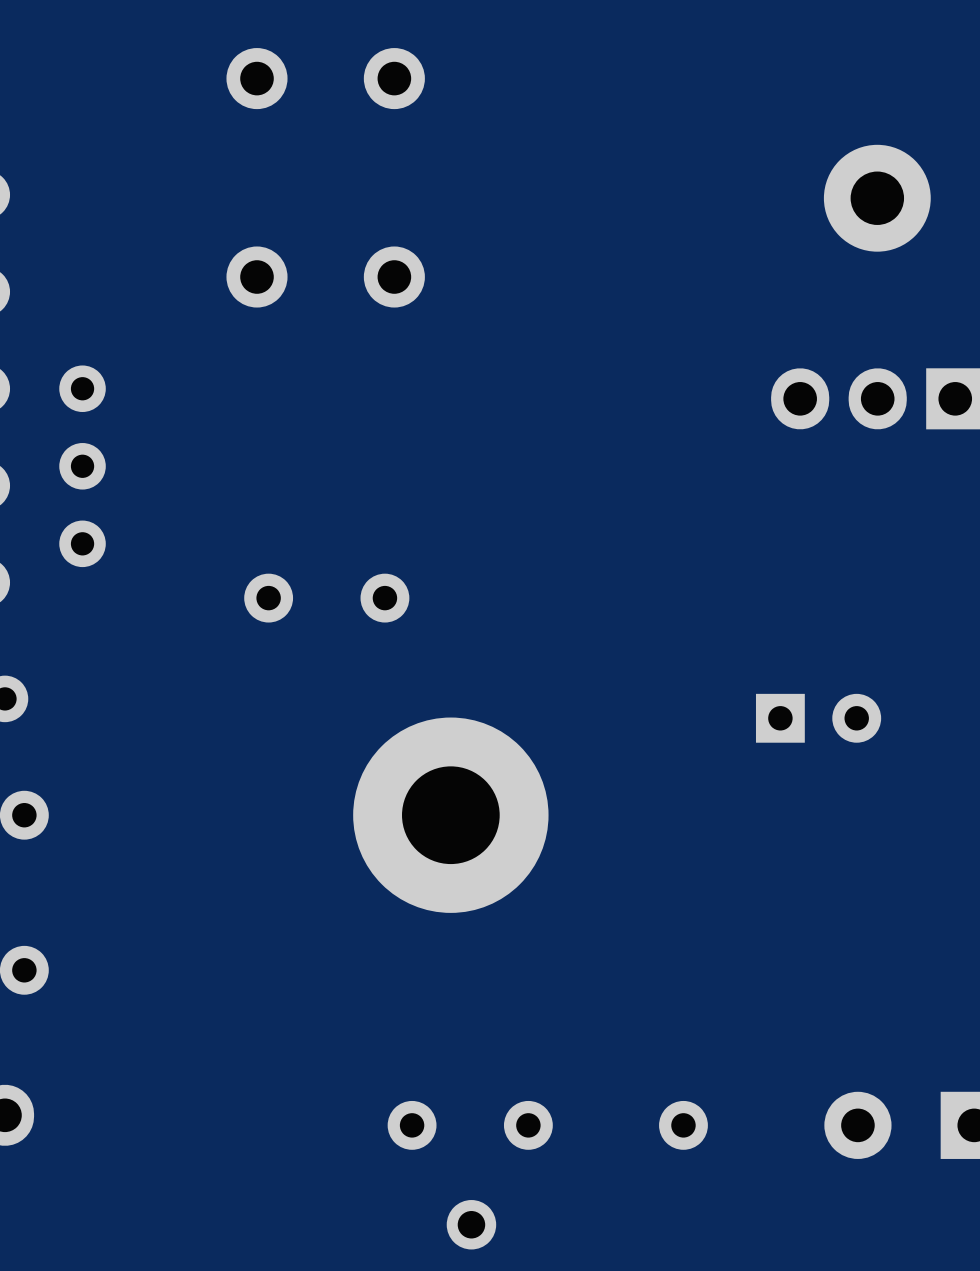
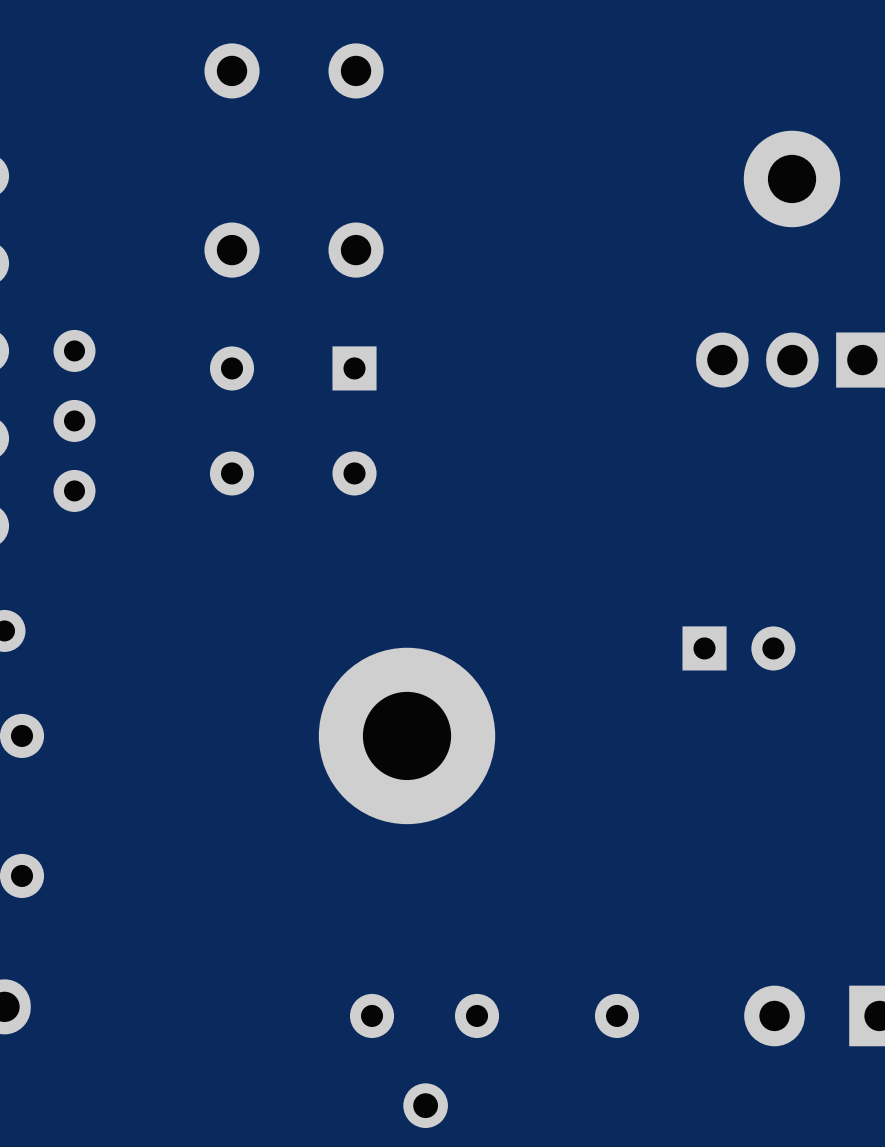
part: none -> (354, 420)
part rotation: 0° (326, 598) -> 90° clockwise (232, 420)
part position: (326, 598) -> (232, 420)

